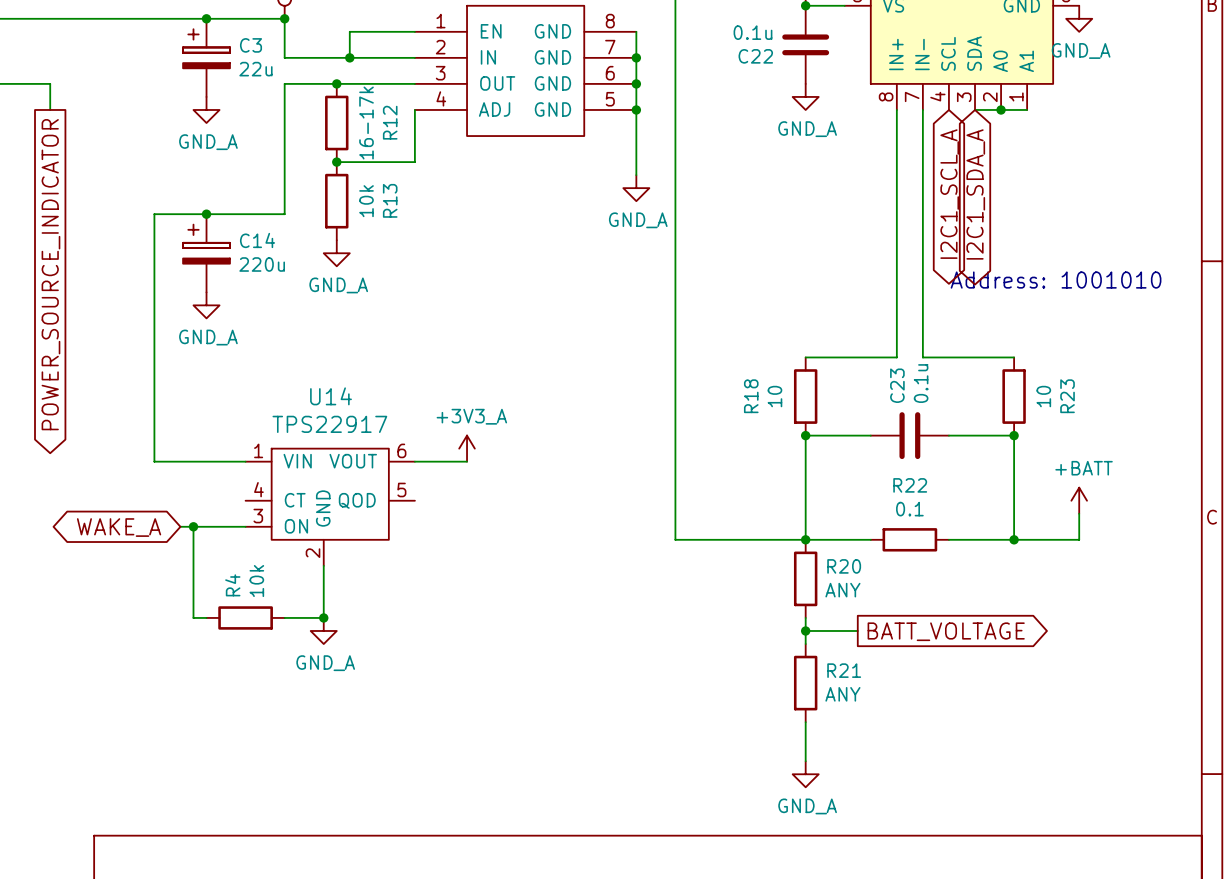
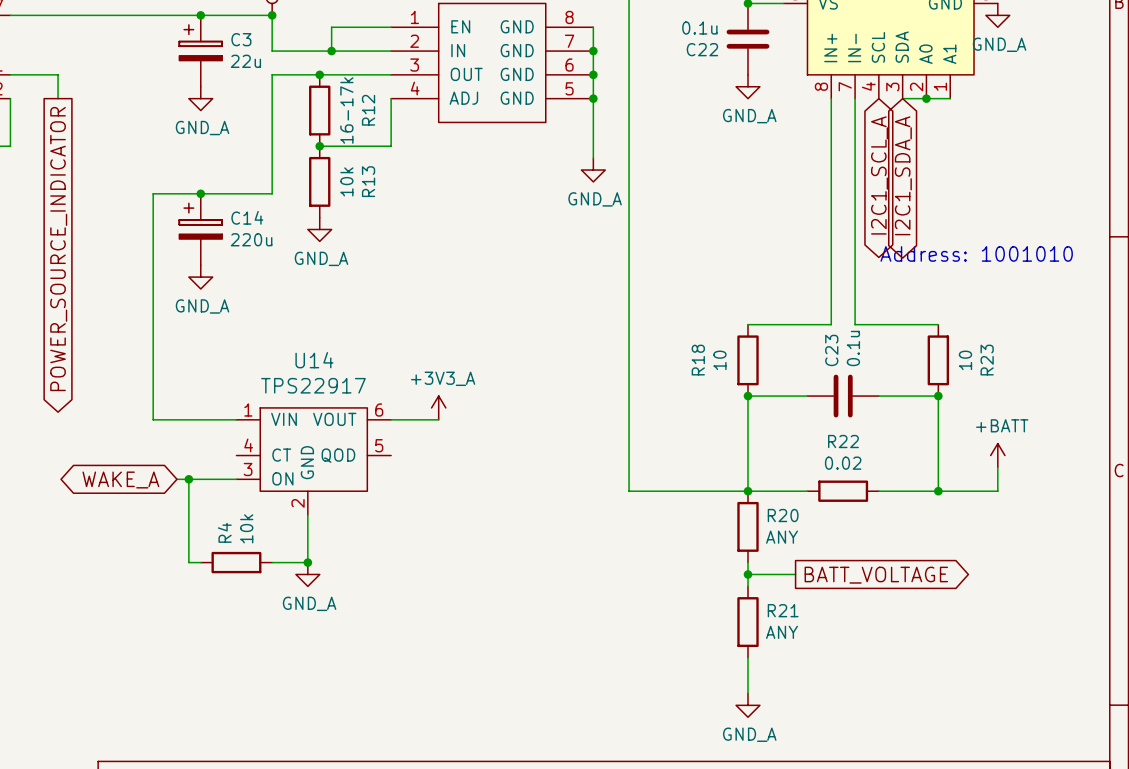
R22 value: 0.1 (909, 509) -> 0.02 (843, 463)

